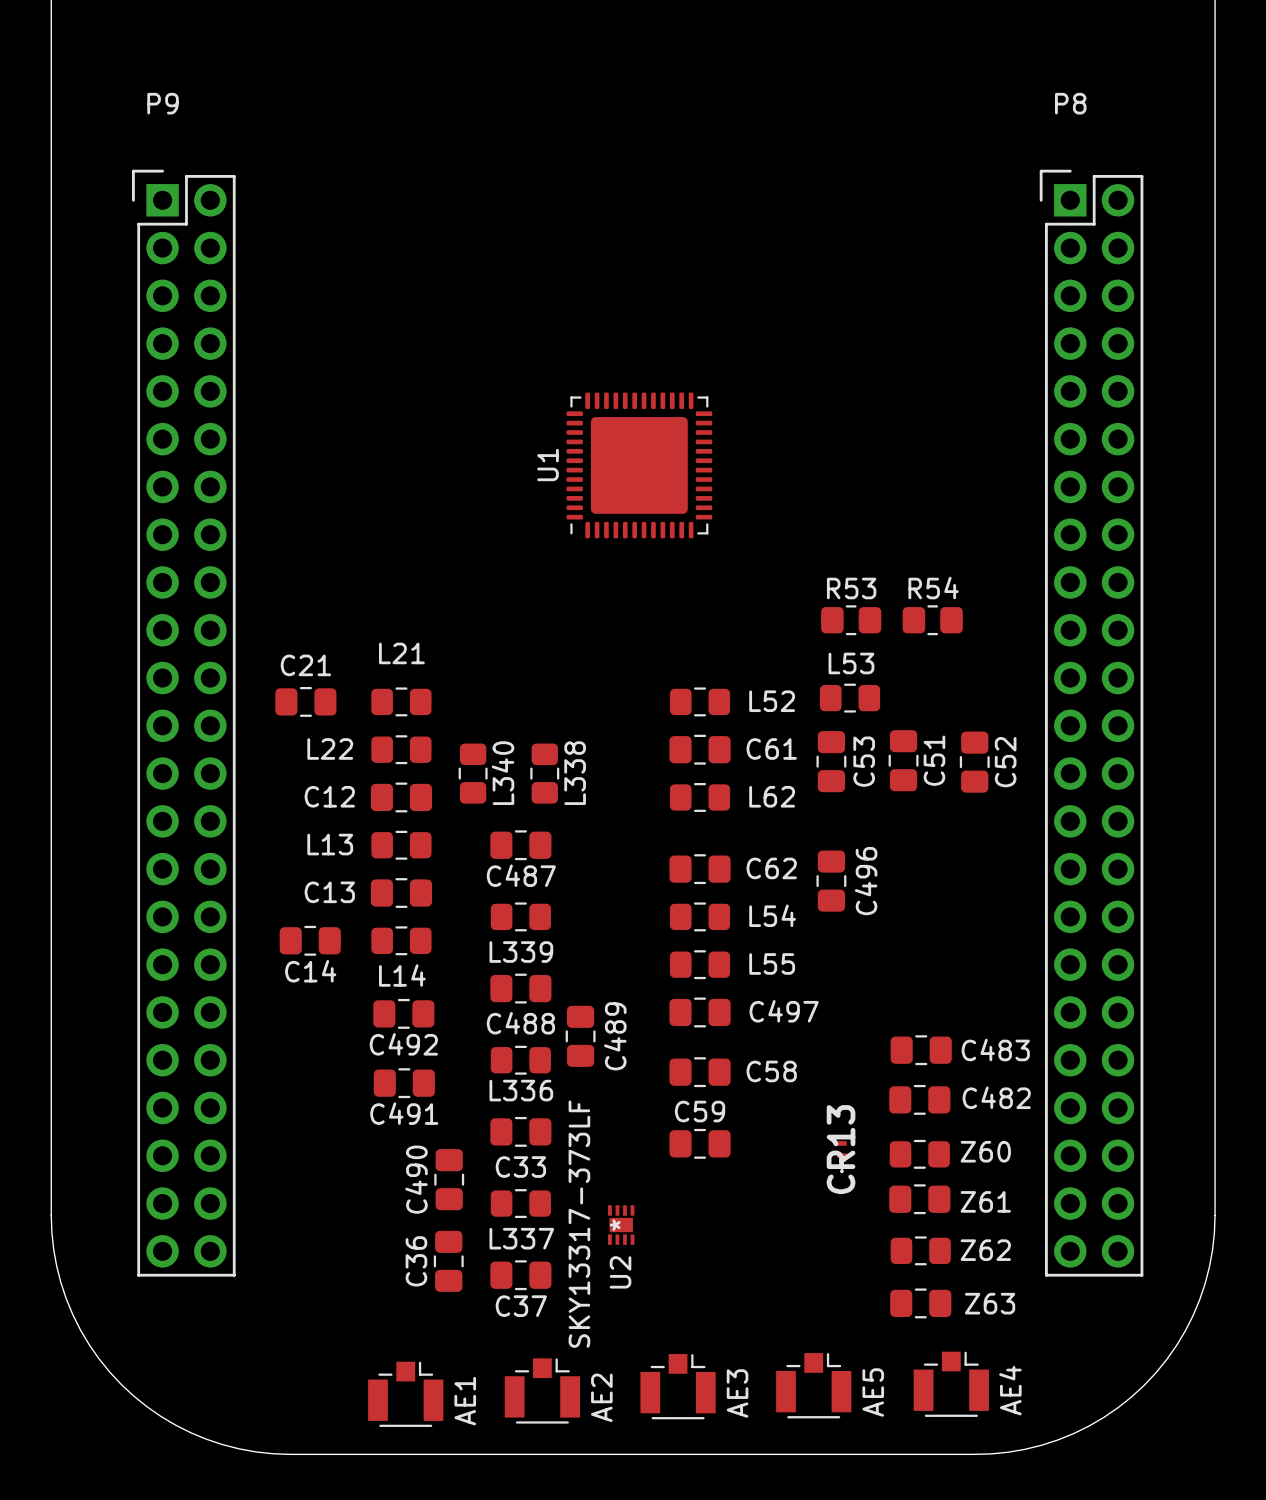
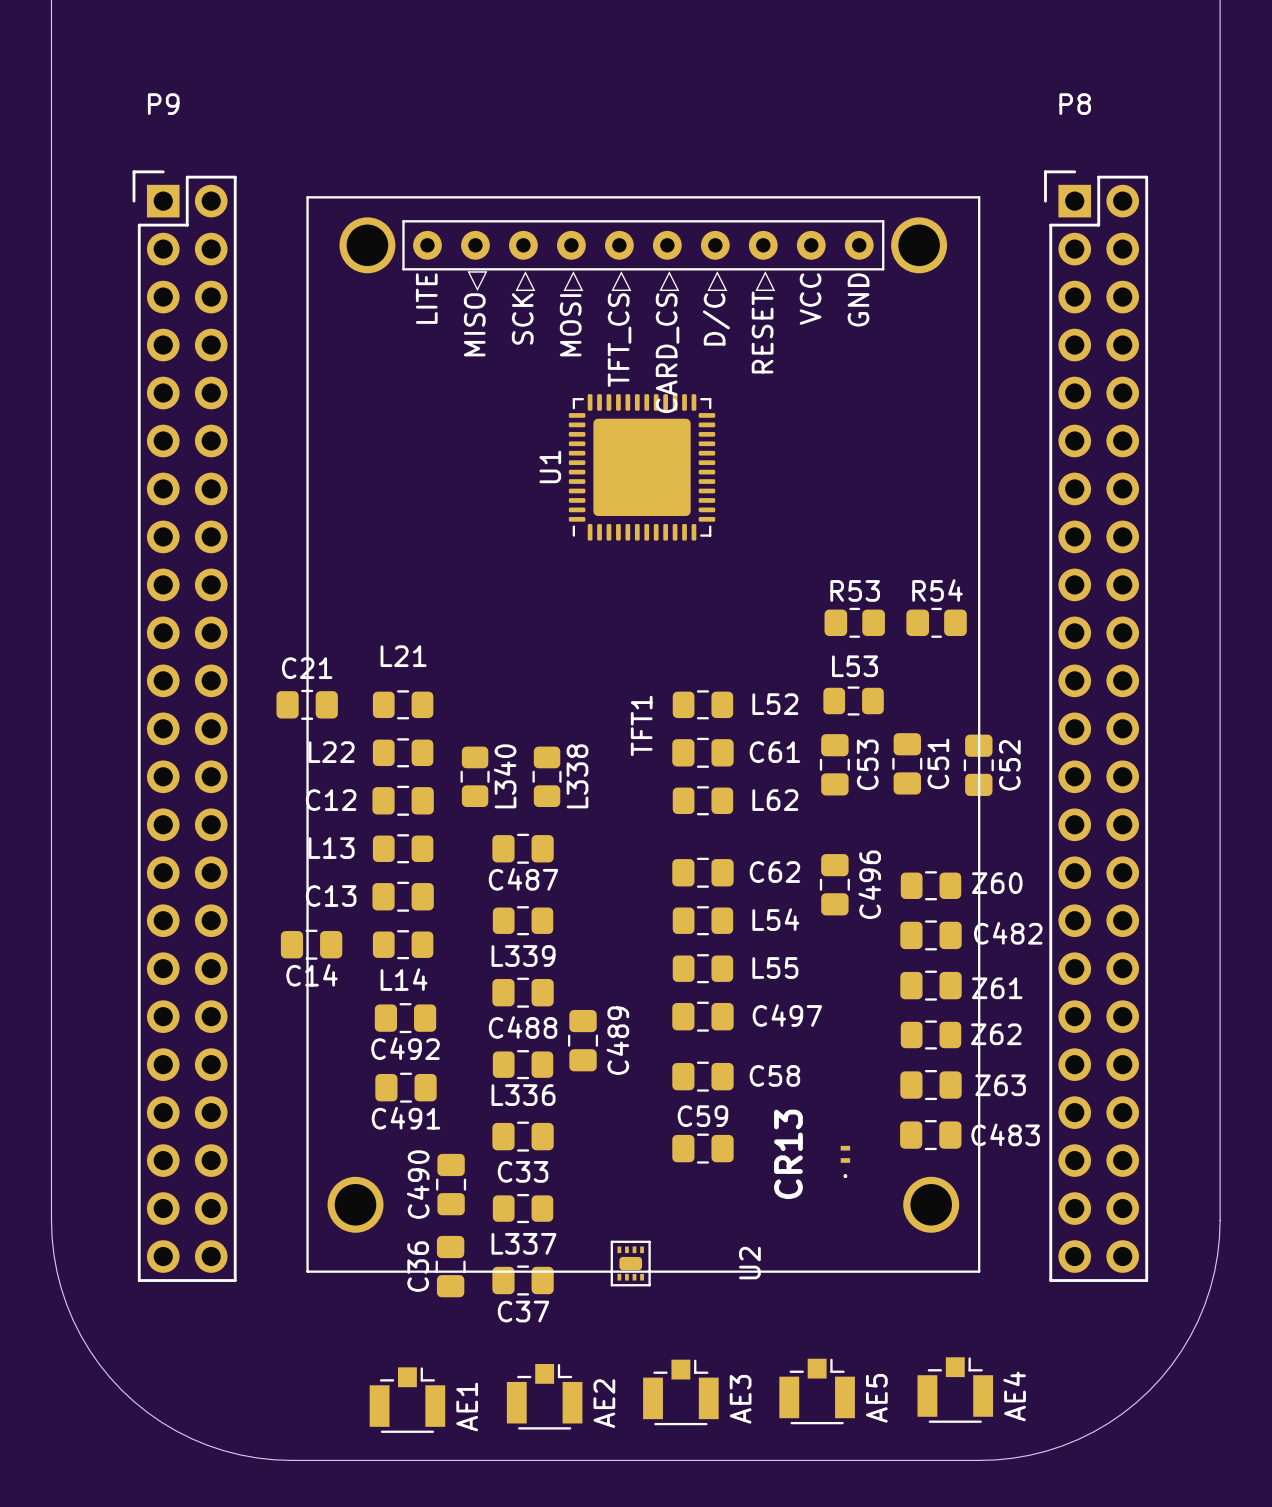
TFT1: none -> (643, 734)
C483 position: (921, 1050) -> (930, 1135)
C482 position: (919, 1099) -> (931, 935)
CR13 name position: CR13 (841, 1149) -> CR13 (788, 1154)
Z60 position: (919, 1154) -> (931, 885)
Z61 position: (919, 1199) -> (931, 985)
U2 footprint: [608, 1205, 635, 1245] -> [610, 1240, 651, 1287]
U2 value: SKY13317-373LF (579, 1224) -> none
Z62 position: (920, 1250) -> (931, 1034)
U2 name position: U2 (620, 1272) -> U2 (749, 1263)
Z63 position: (920, 1303) -> (931, 1085)

